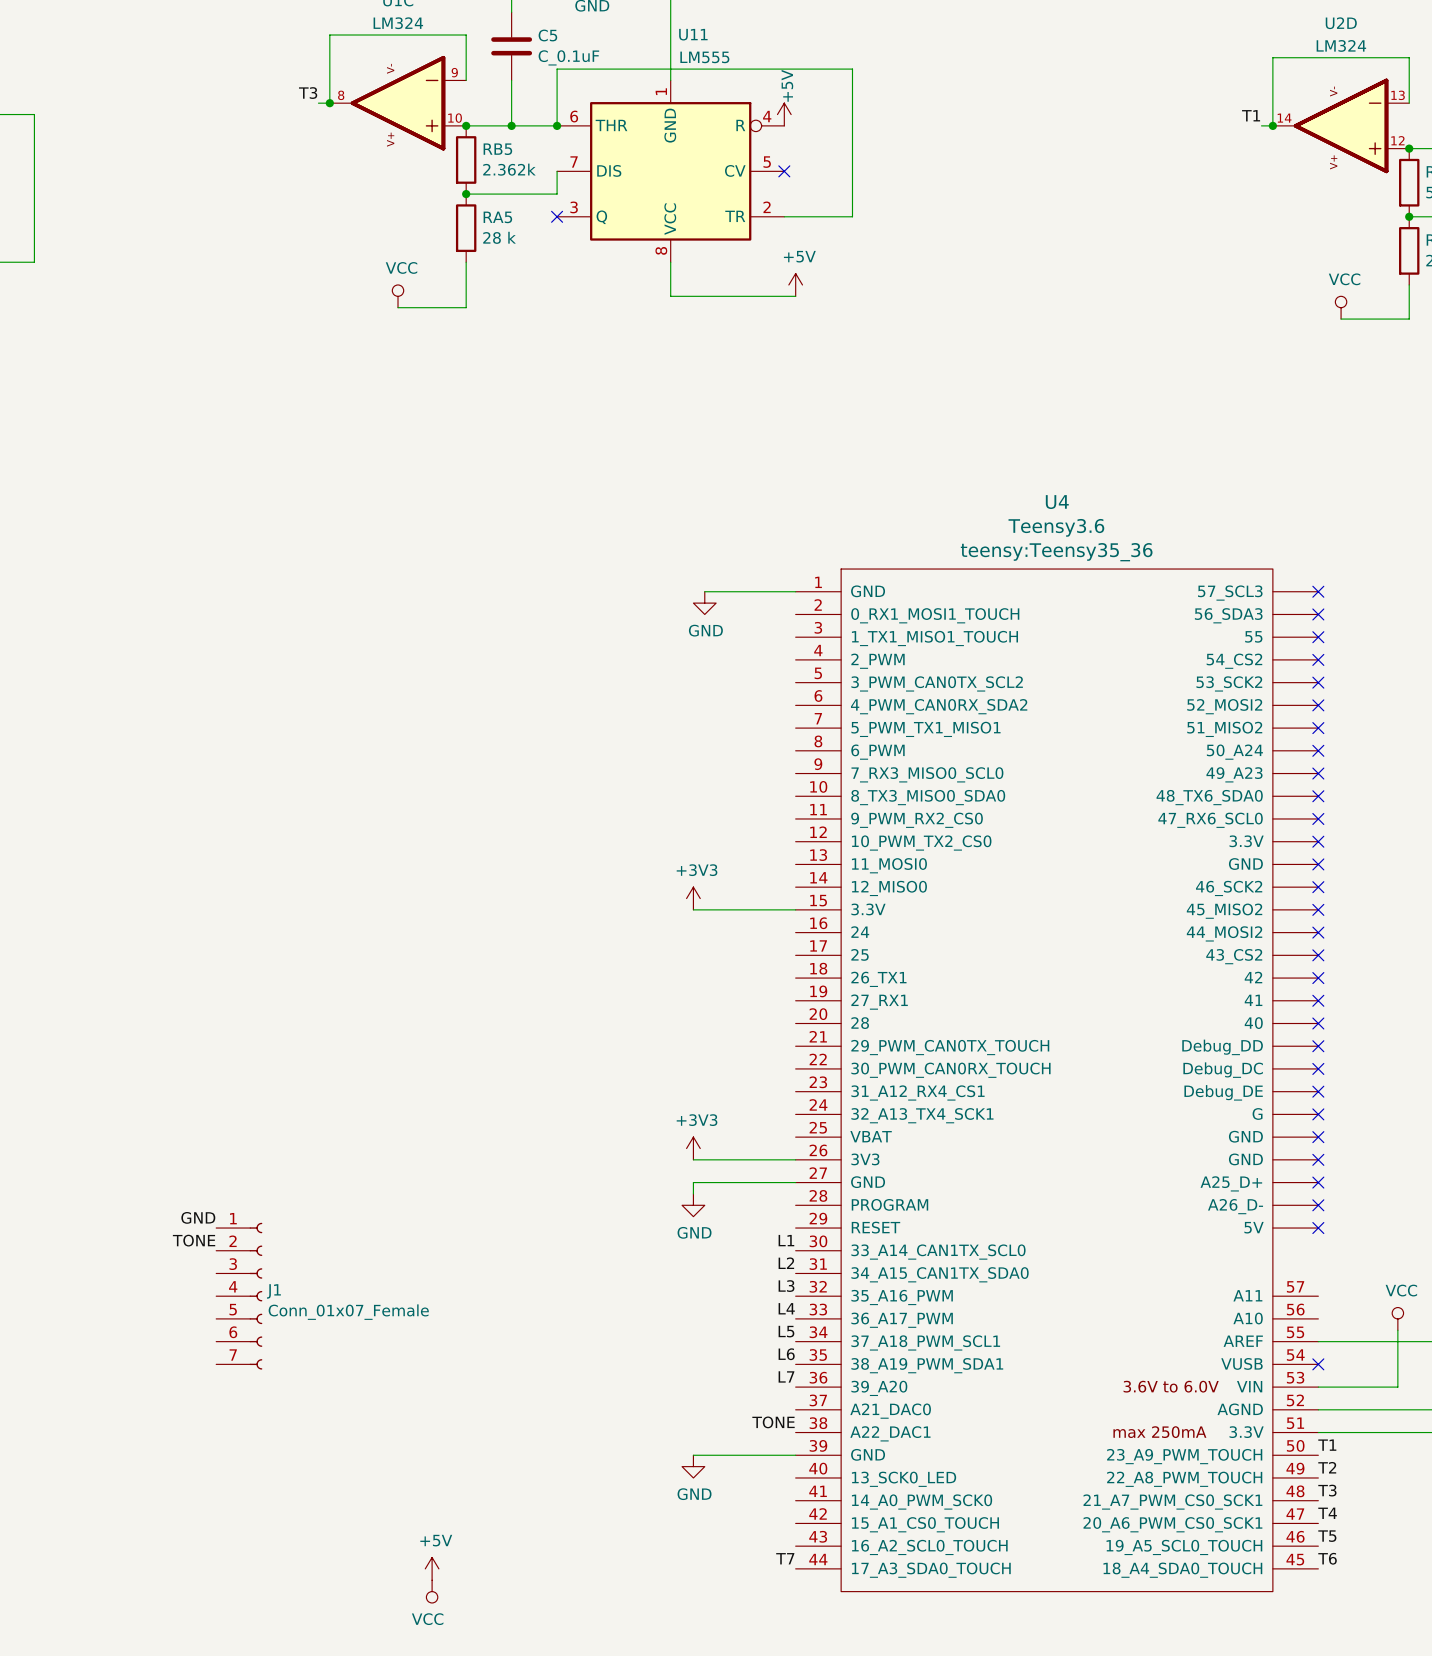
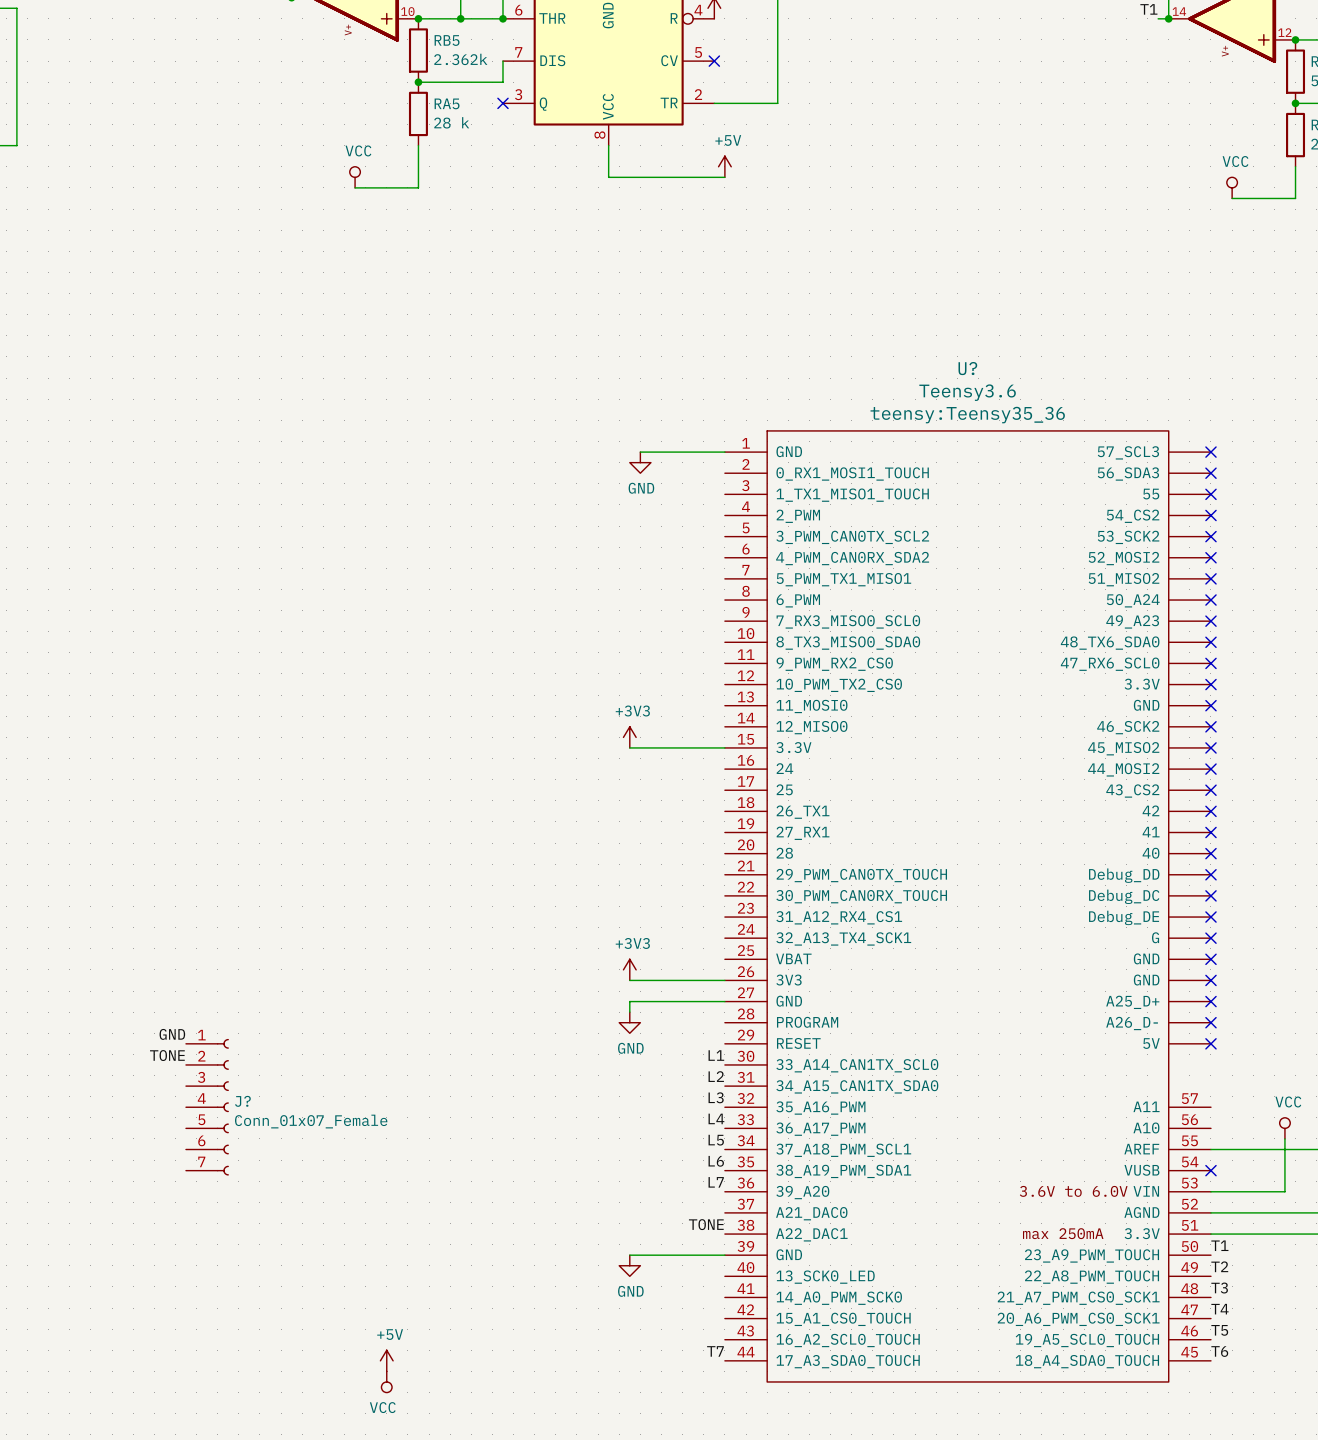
U4 name: U4 (1057, 502) -> U? (967, 368)
J1 name: J1 (273, 1291) -> J? (242, 1101)

